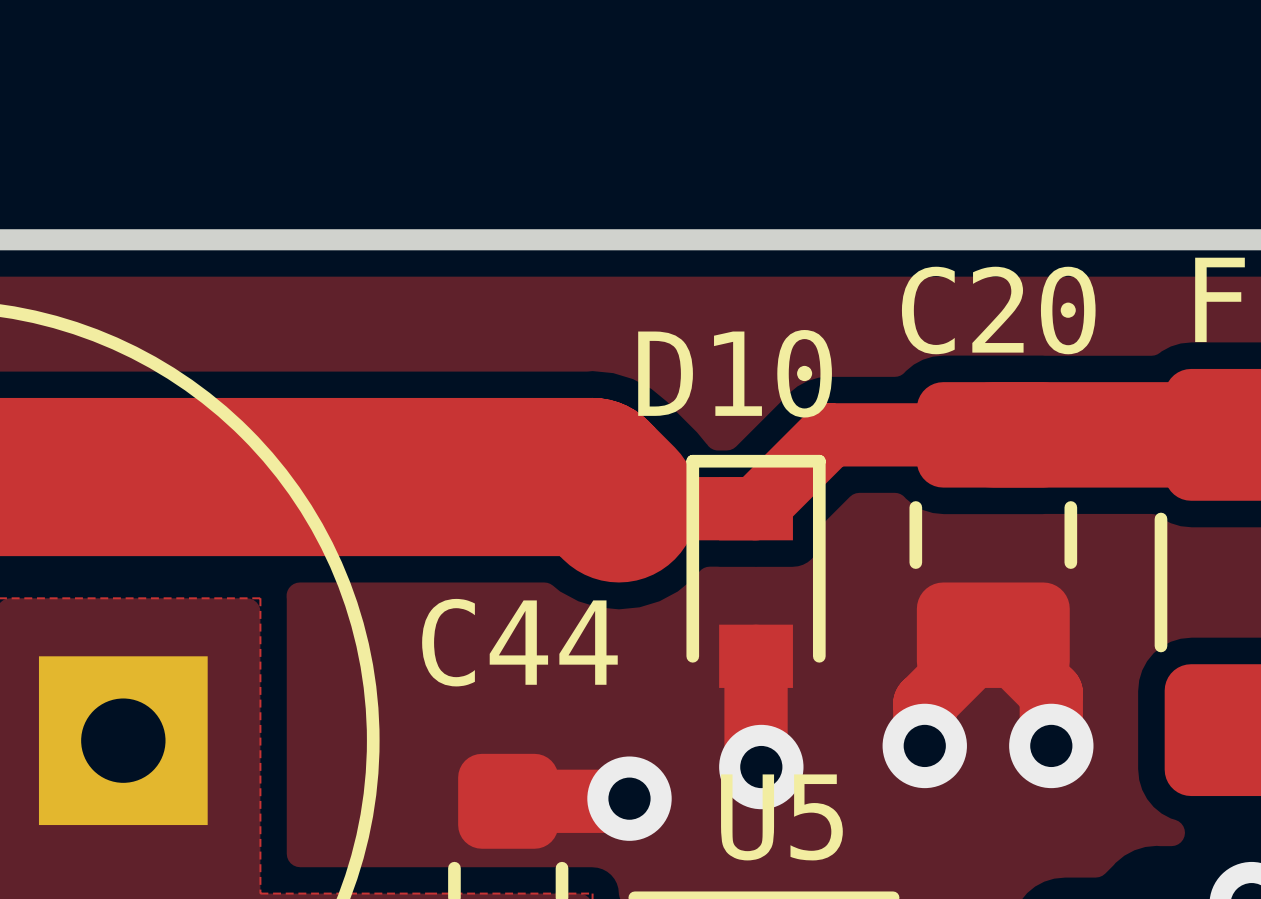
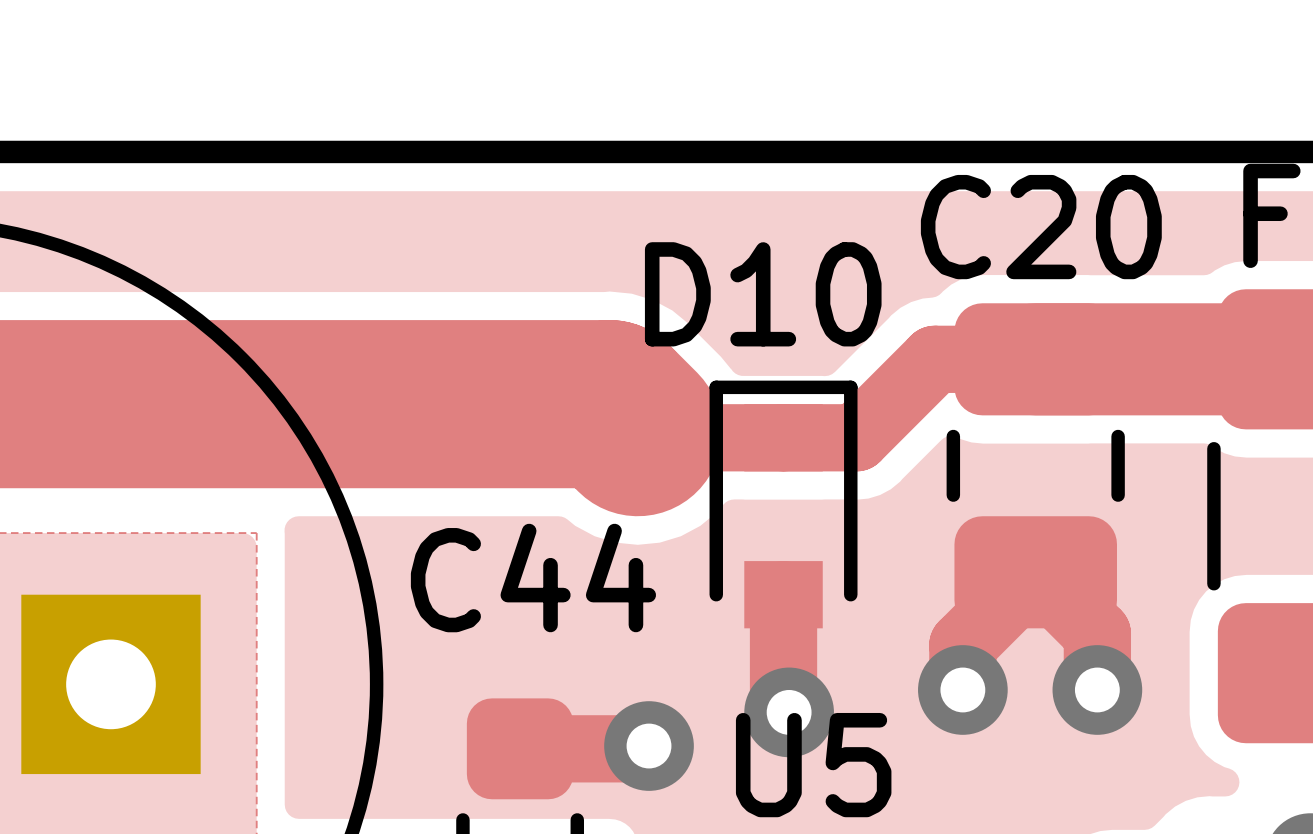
track: (898, 434) (829, 434) (756, 508) -> (934, 359) (856, 437) (783, 437)

